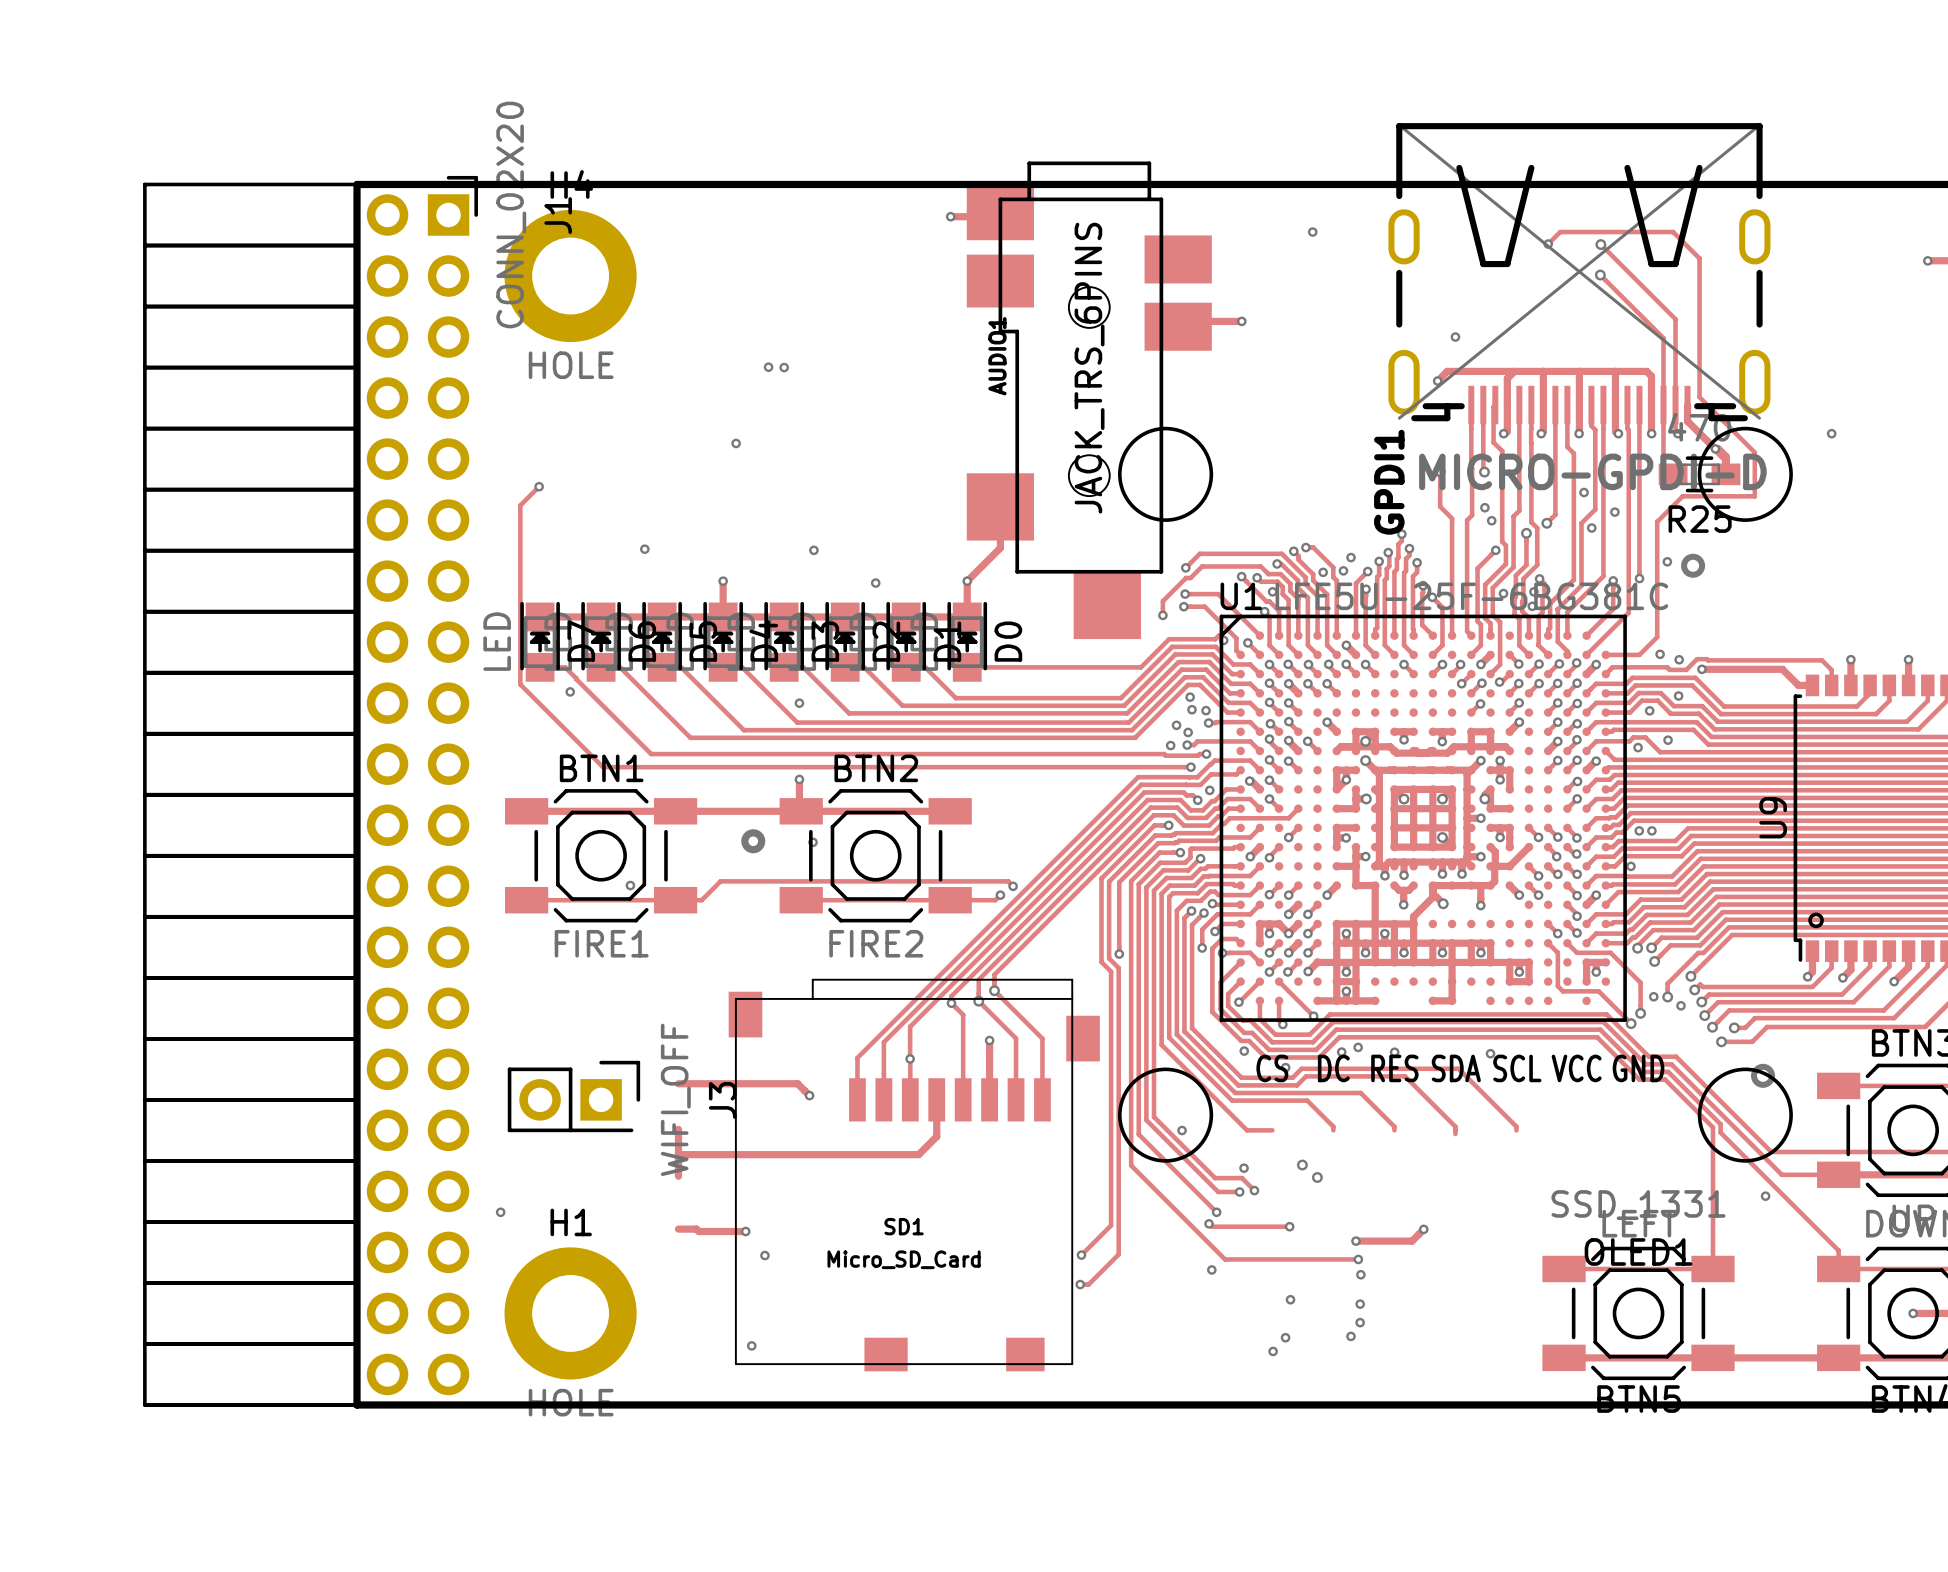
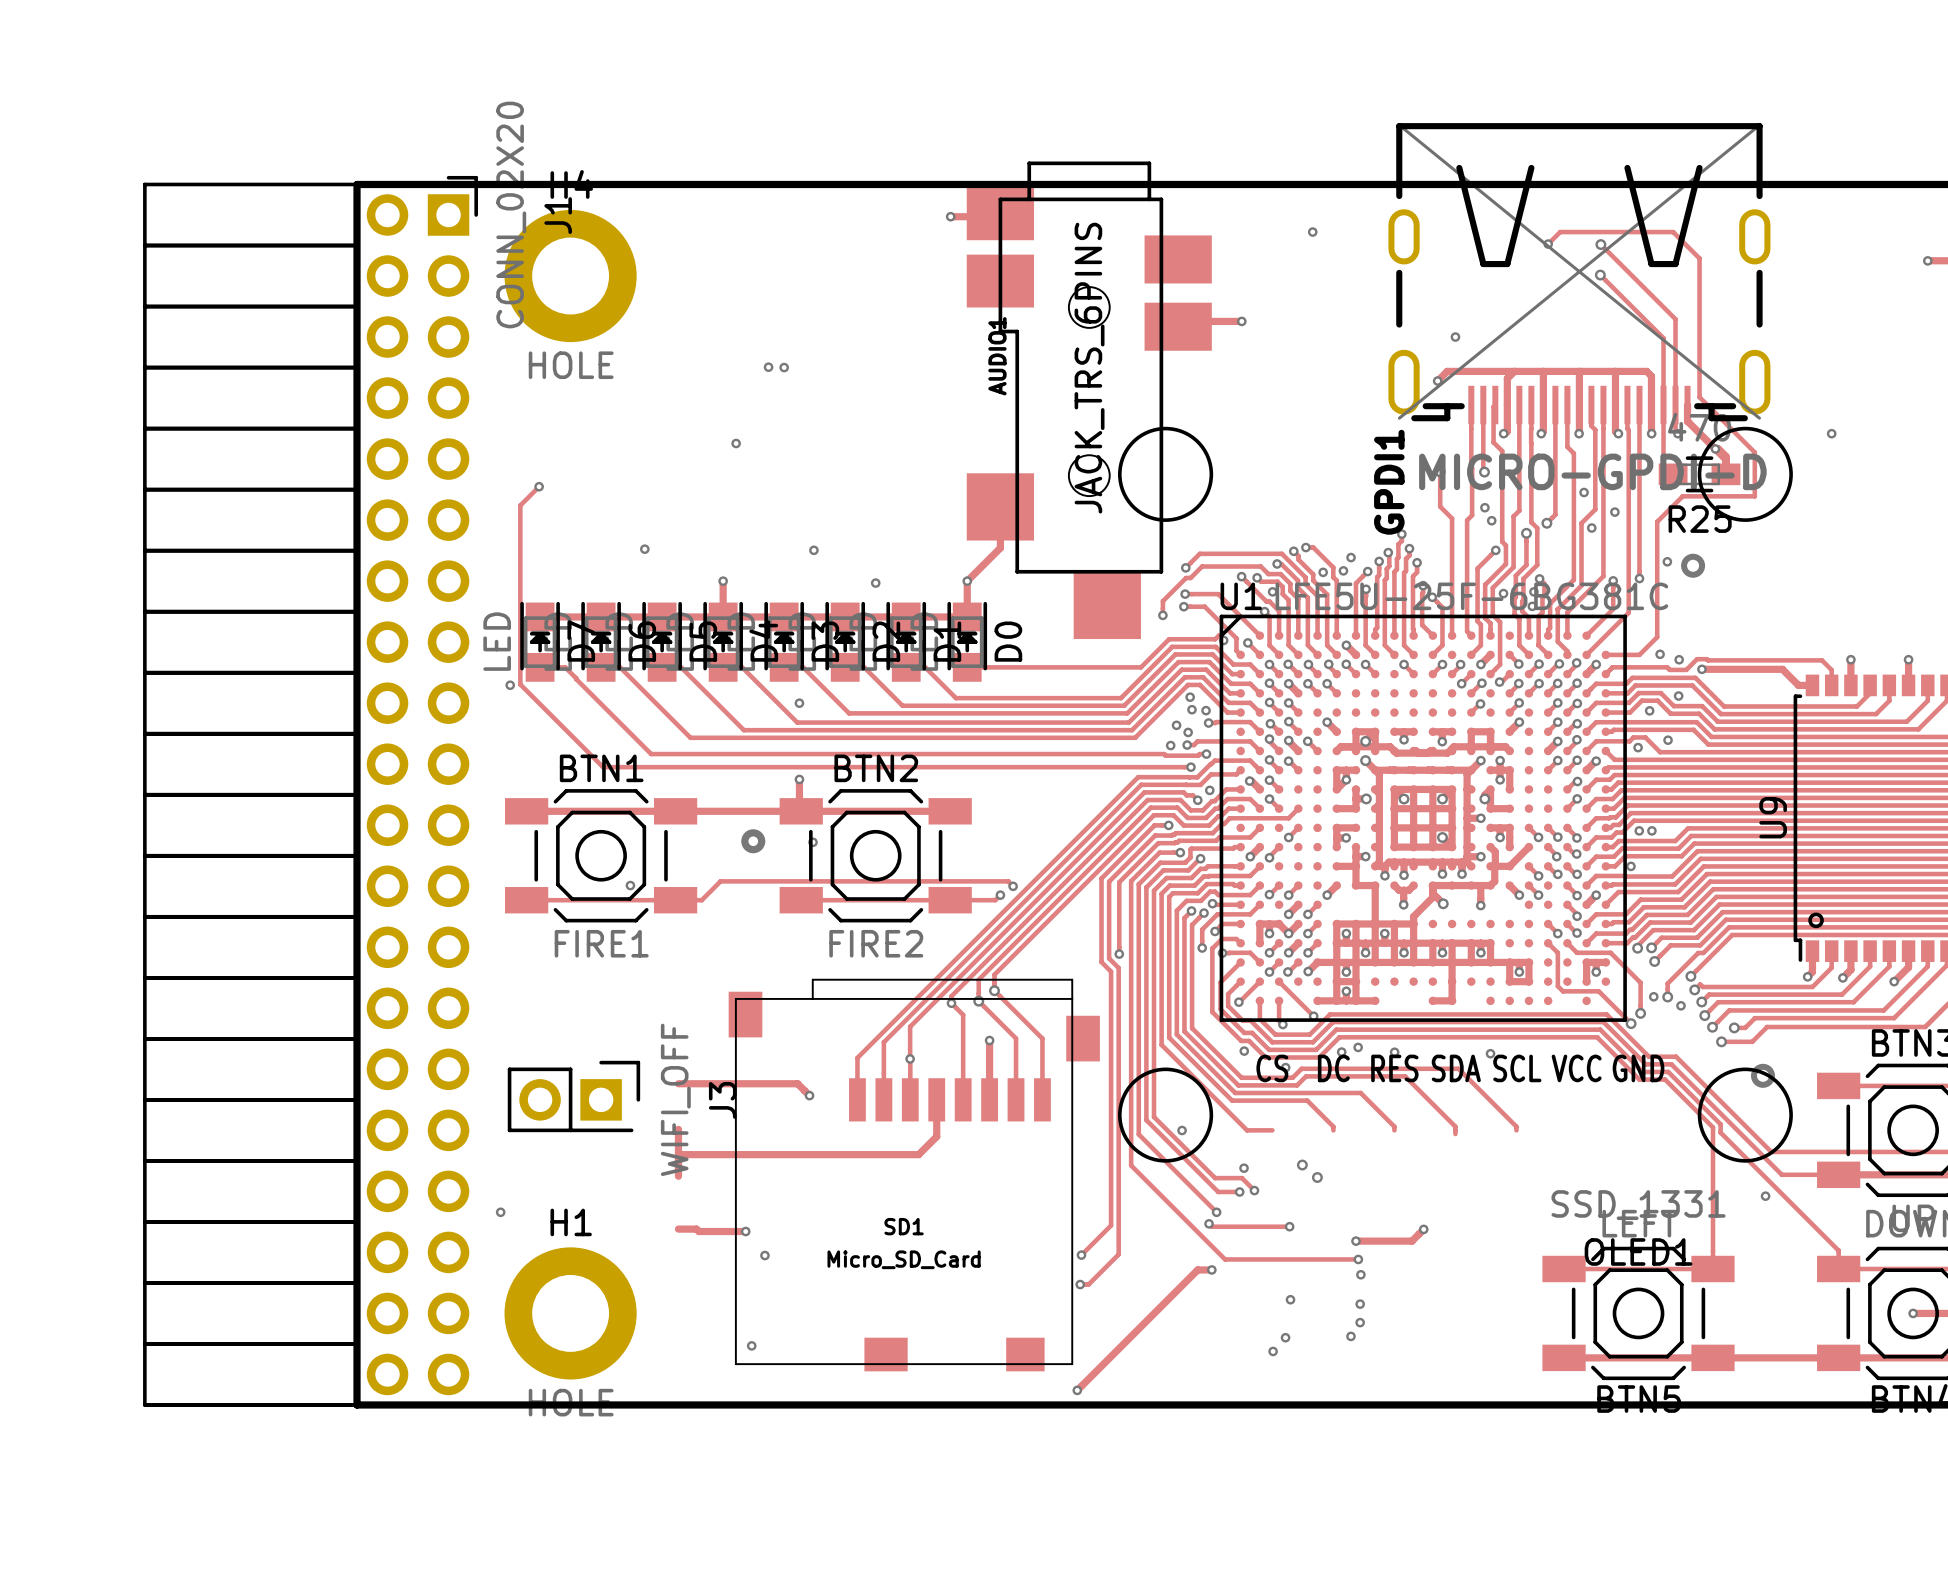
via position: (570, 691) -> (510, 685)
track: none -> (1211, 1269) (1197, 1269) (1077, 1390)
via: none -> (1077, 1390)

